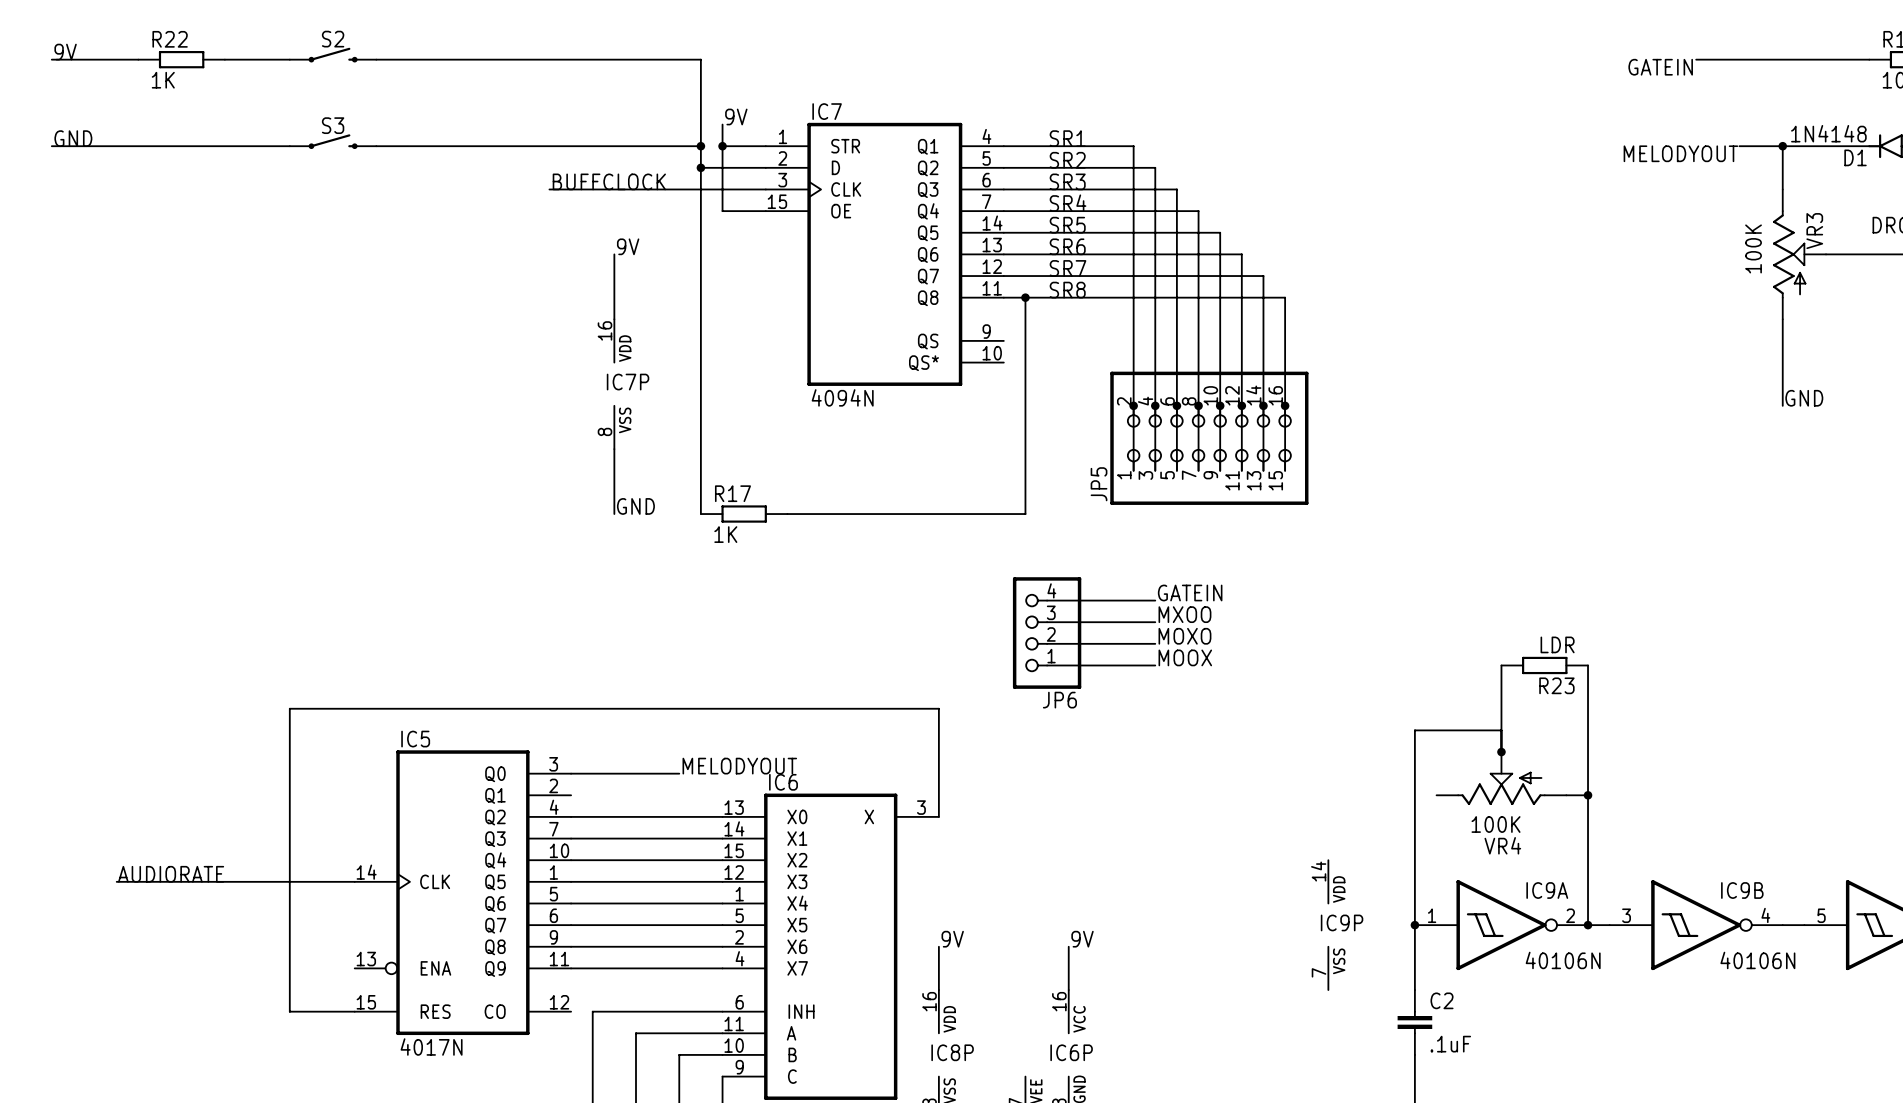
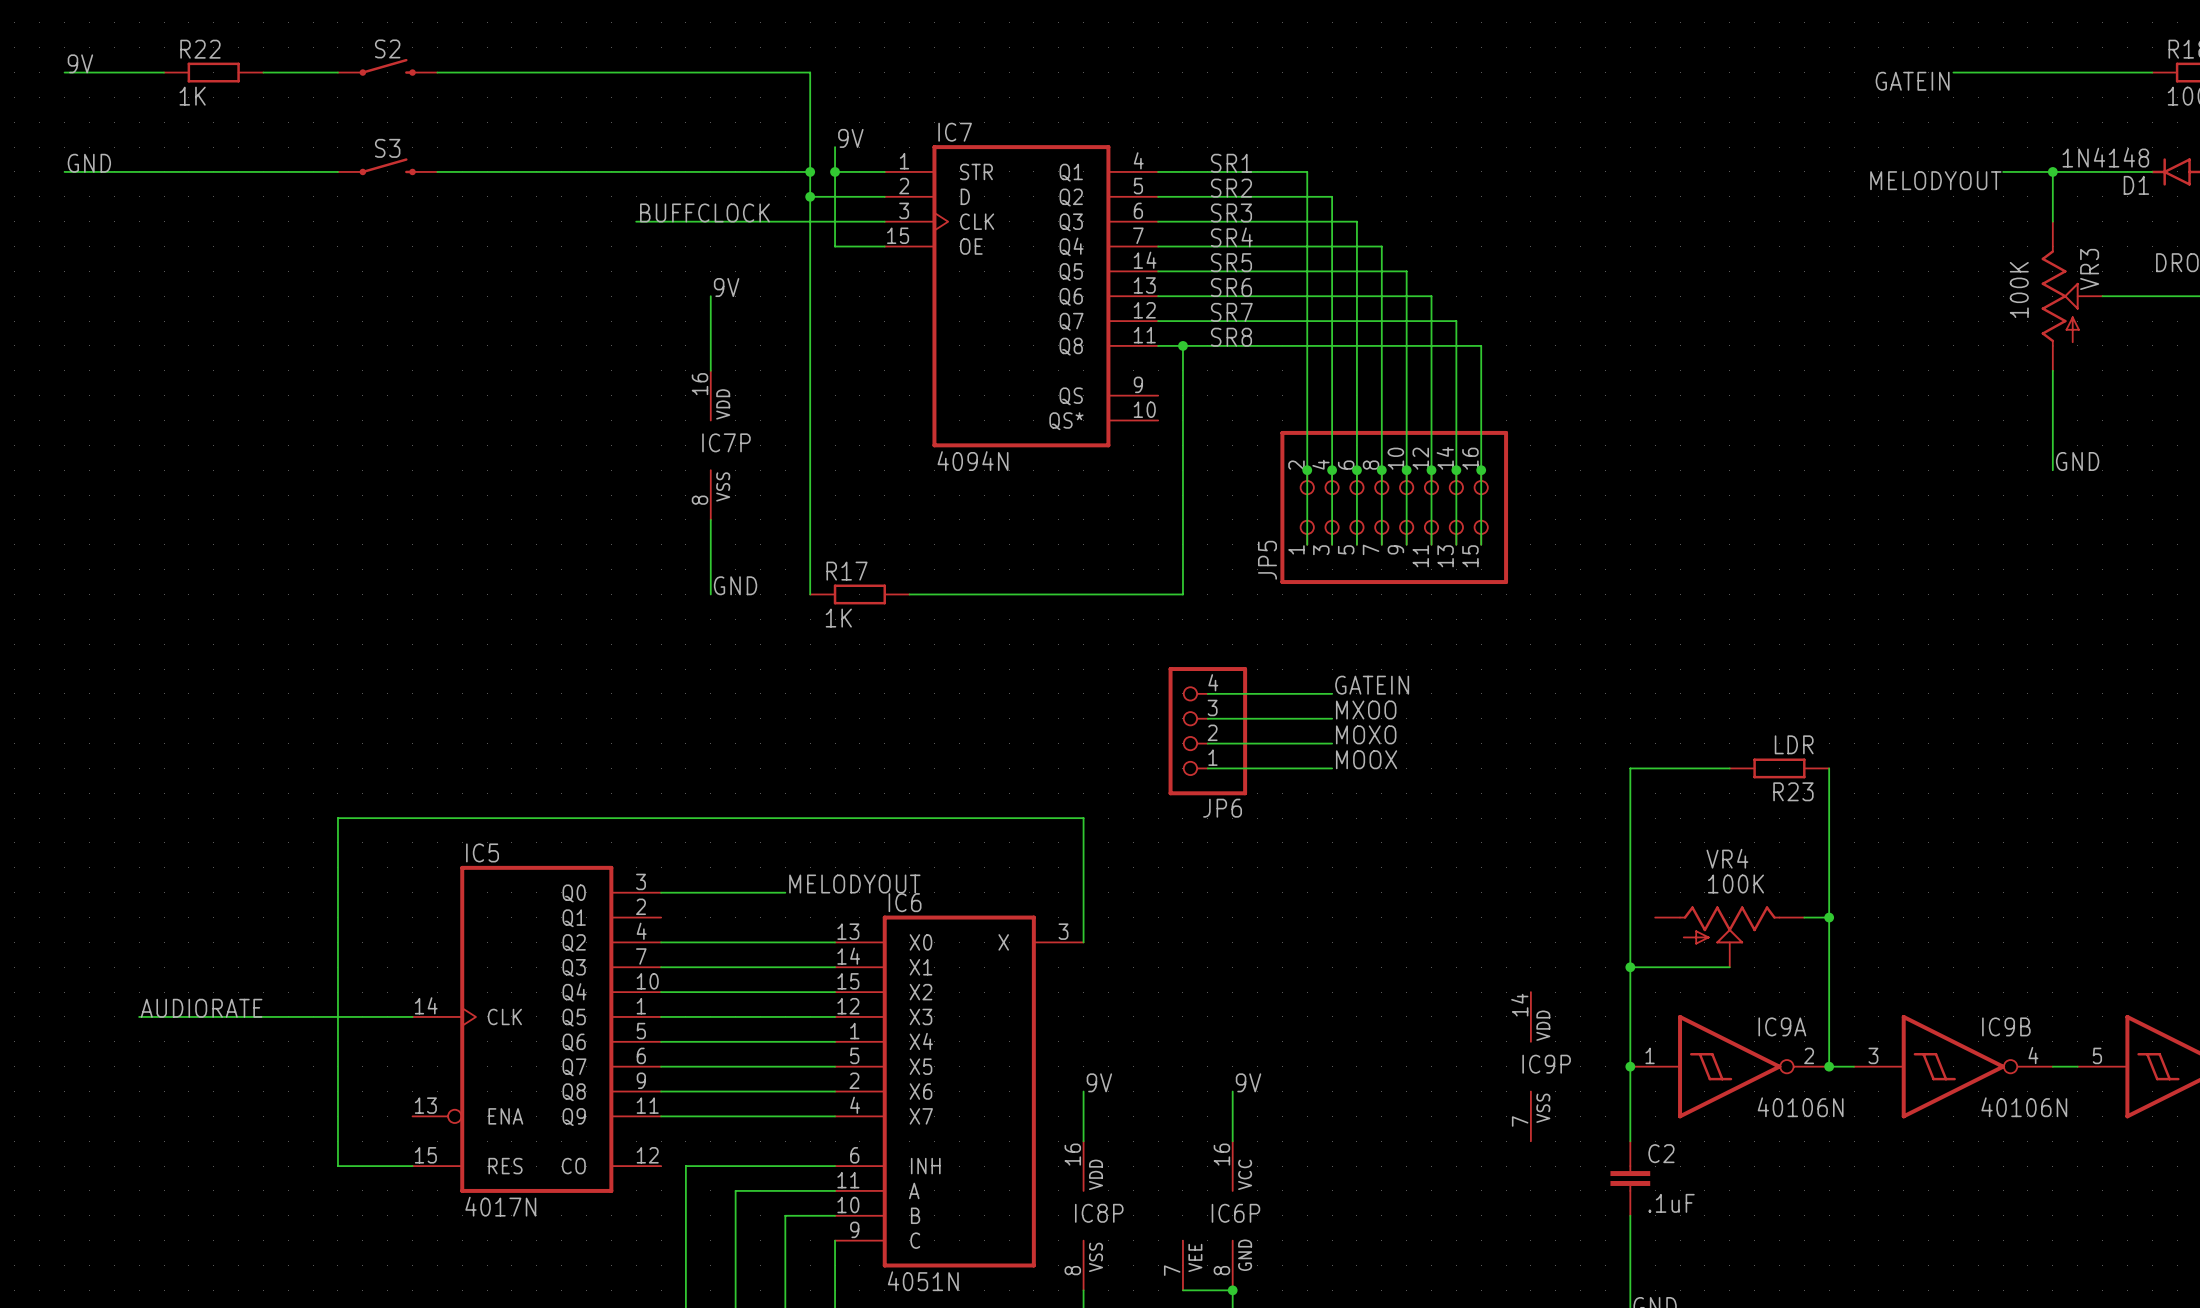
wire: (1501, 665) (1501, 752) -> none
wire: (1414, 730) (1501, 730) -> (1630, 842) (1630, 768) (1729, 768)
junction: (1501, 752) -> none
VR4 rotation: 0° (1501, 788) -> 180° (1729, 925)
wire: none -> (1630, 967) (1729, 967)
junction: none -> (1630, 967)

